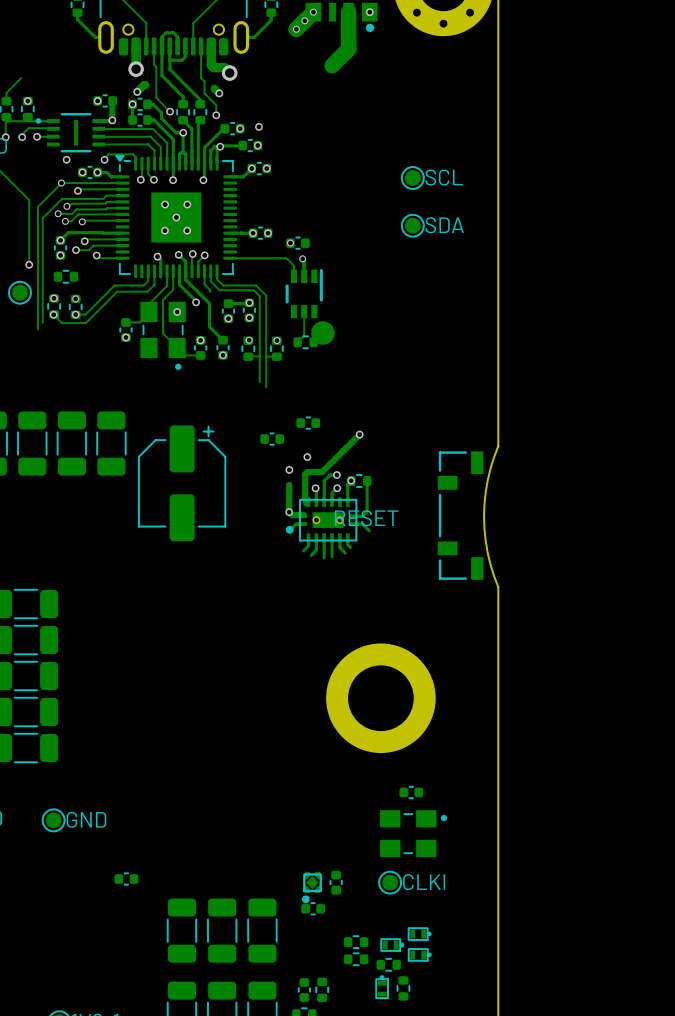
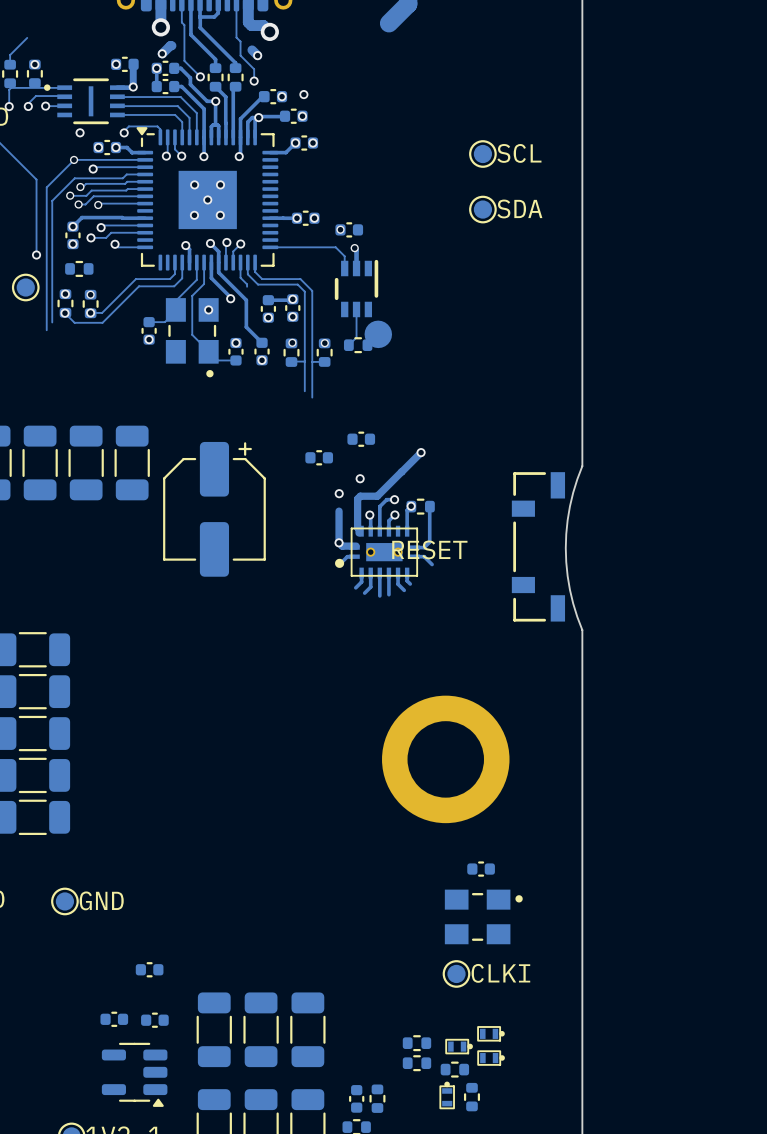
part: (336, 882) -> none
part: (311, 887) -> none
part: (313, 908) -> none
part: none -> (114, 1019)
part: none -> (154, 1020)
part: none -> (134, 1074)

